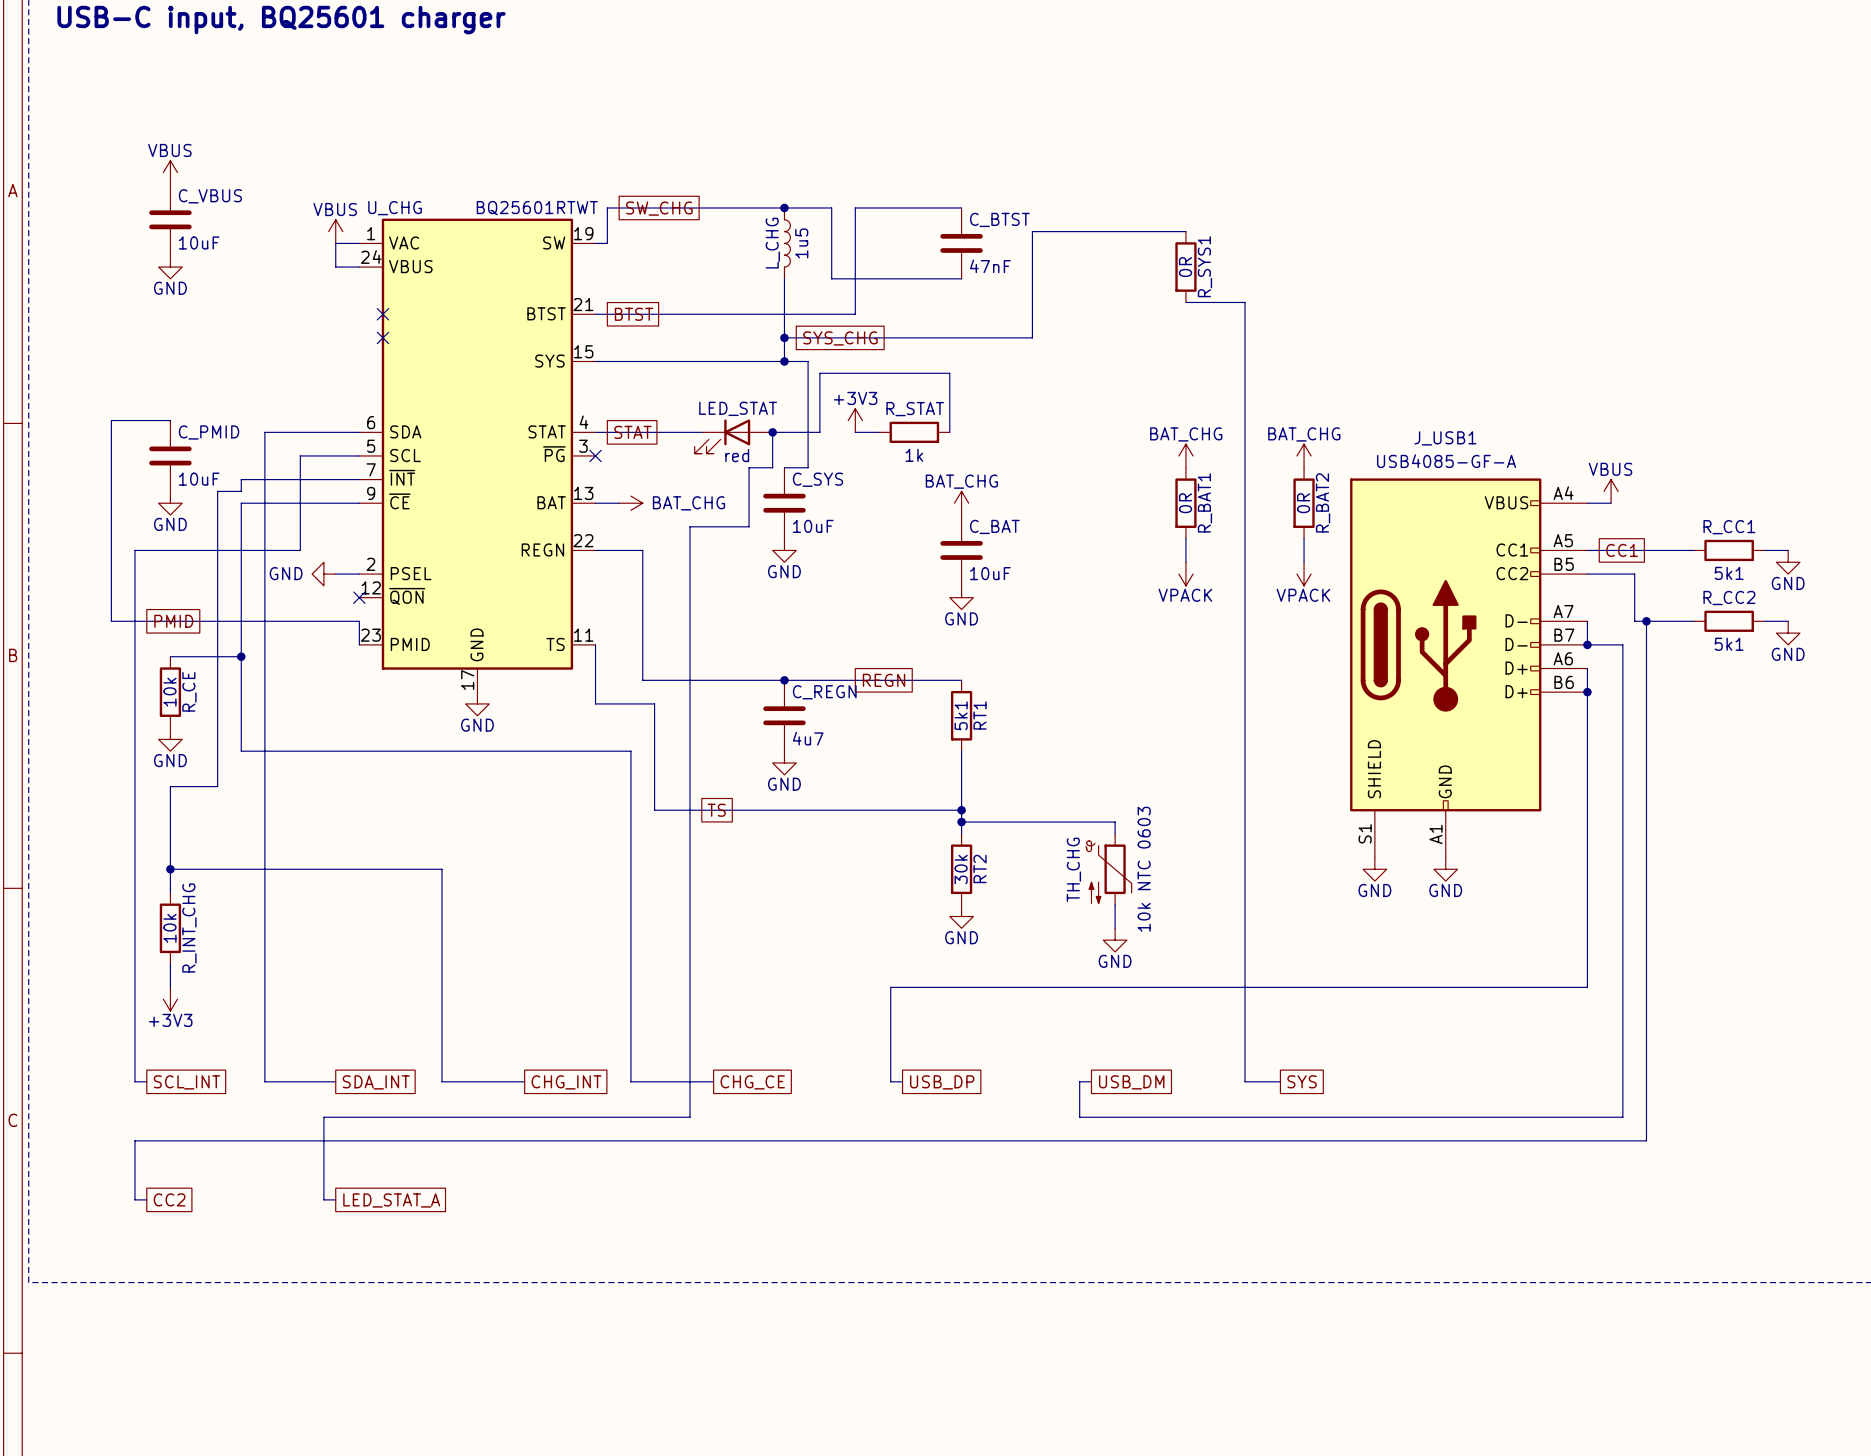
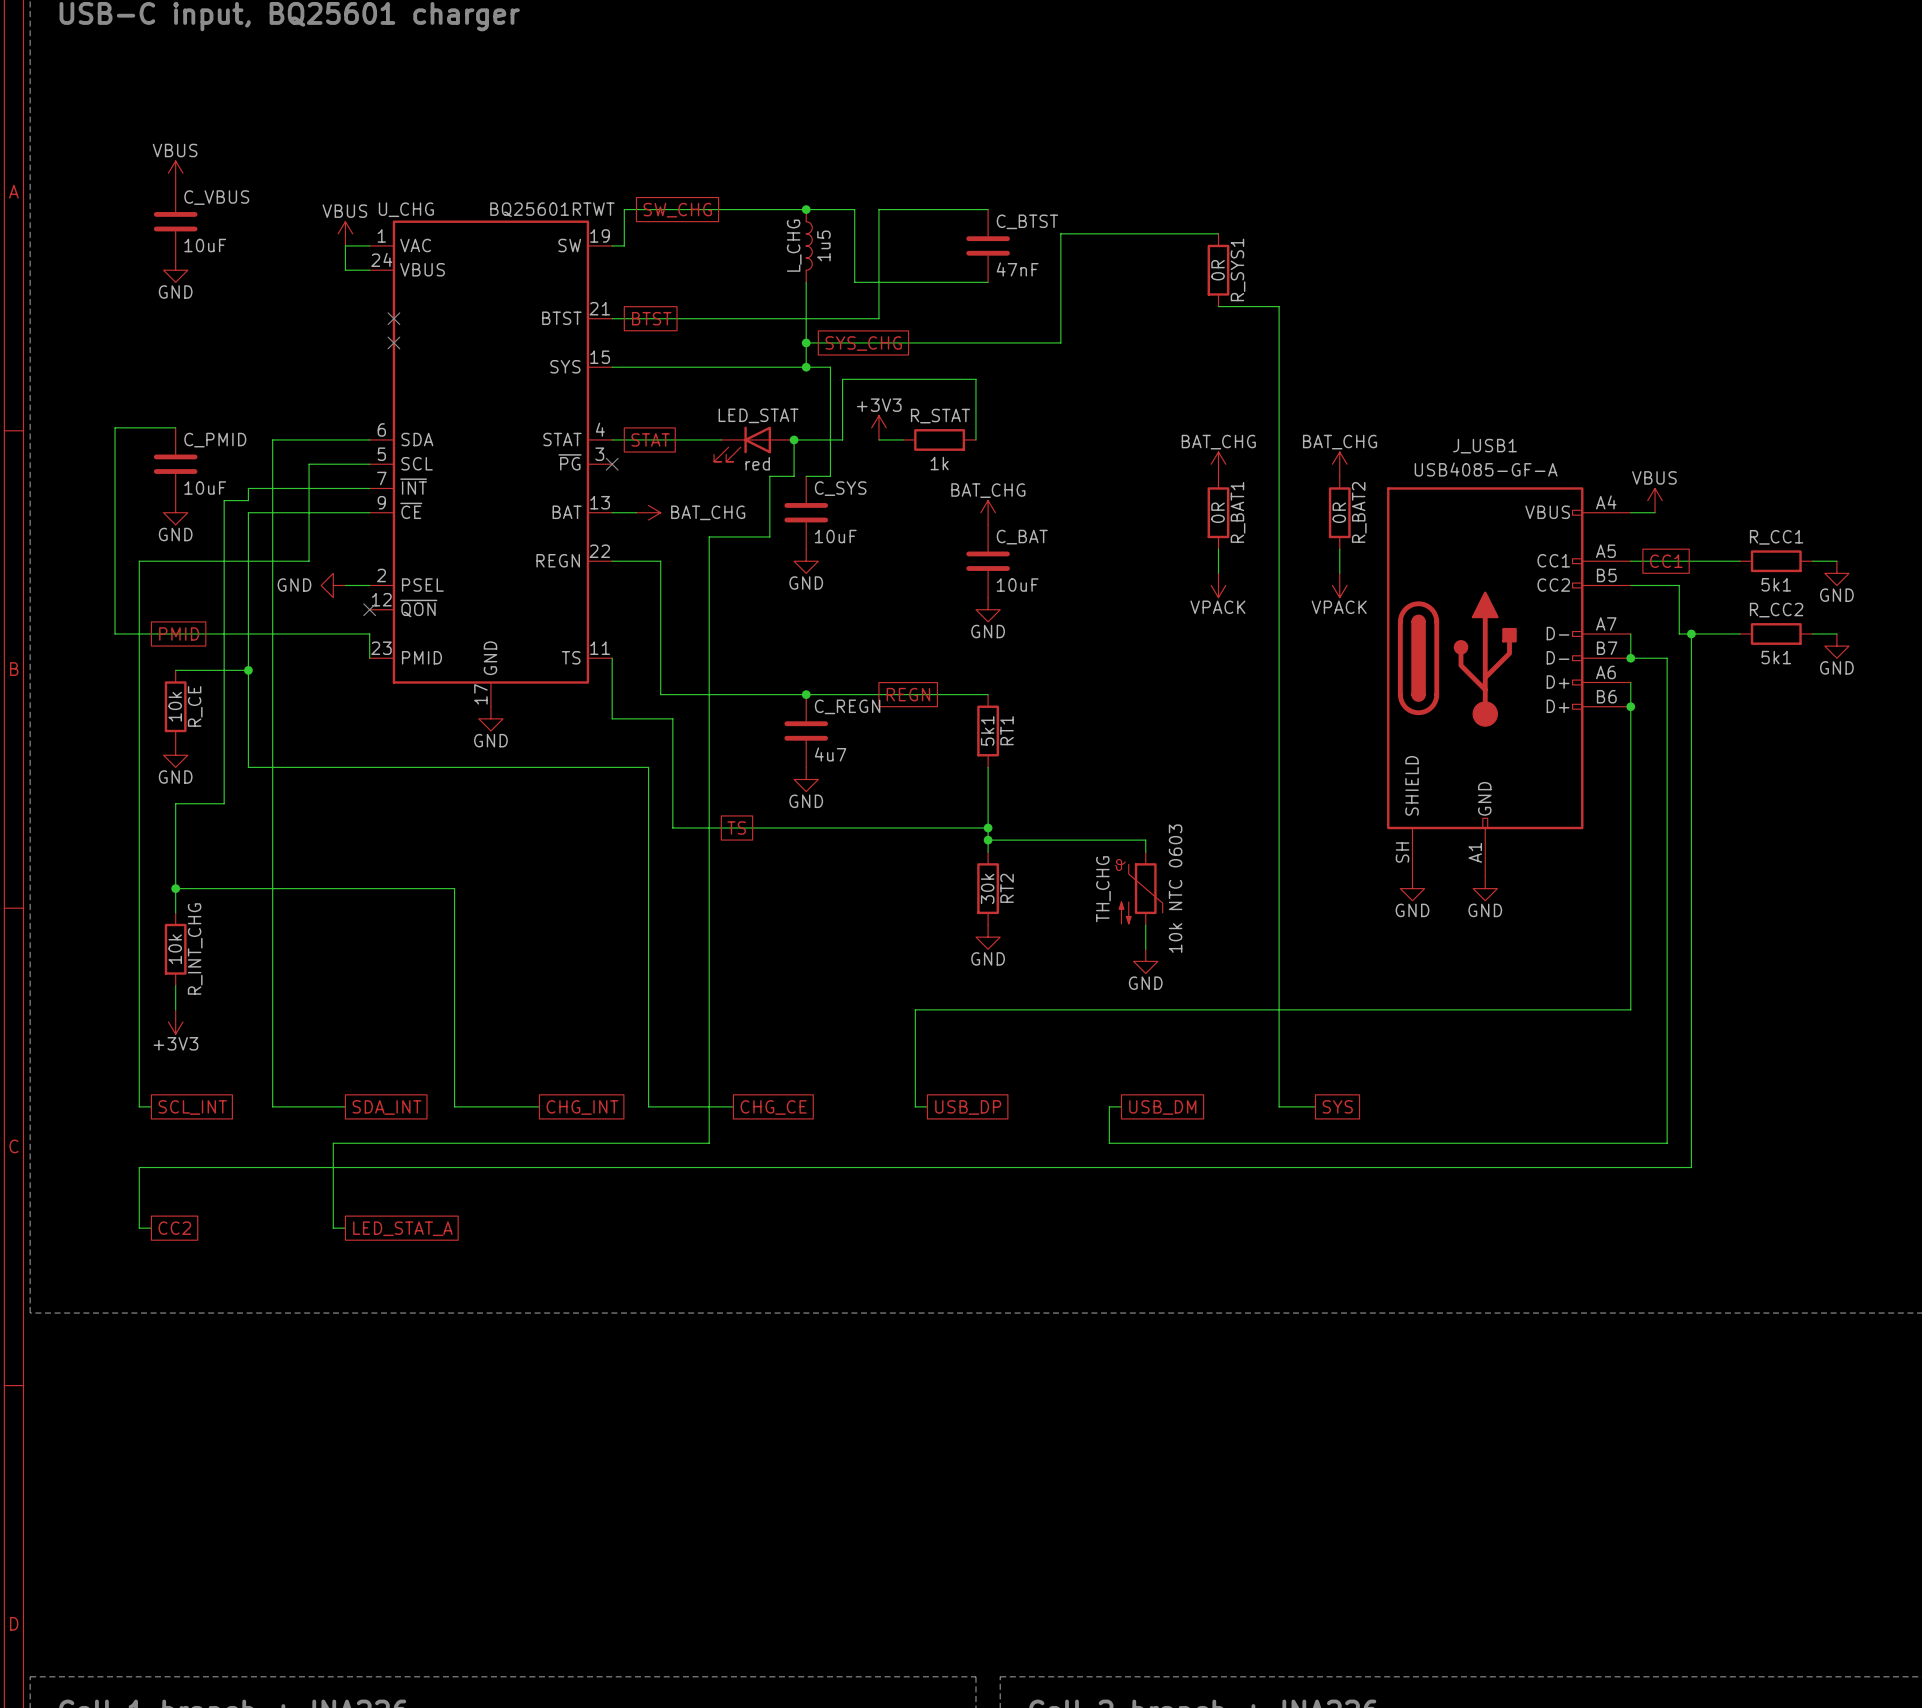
J_USB1 pin number: S1 (1365, 833) -> SH (1402, 852)

